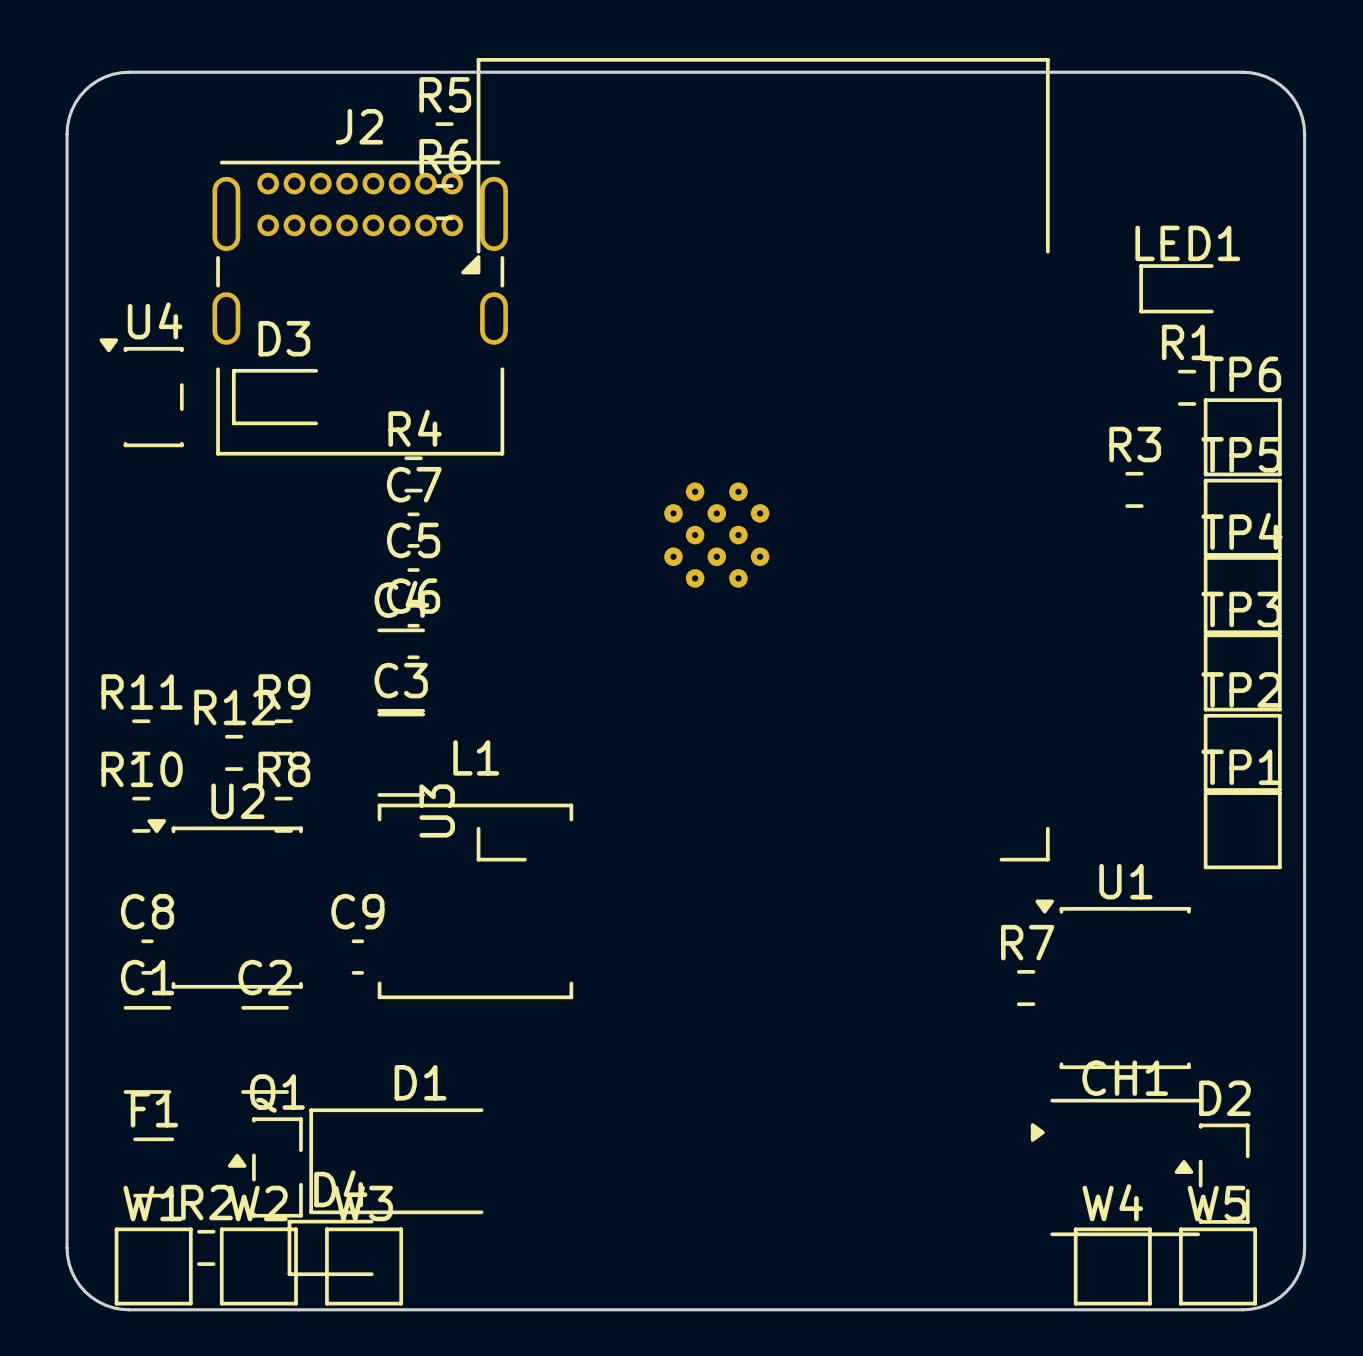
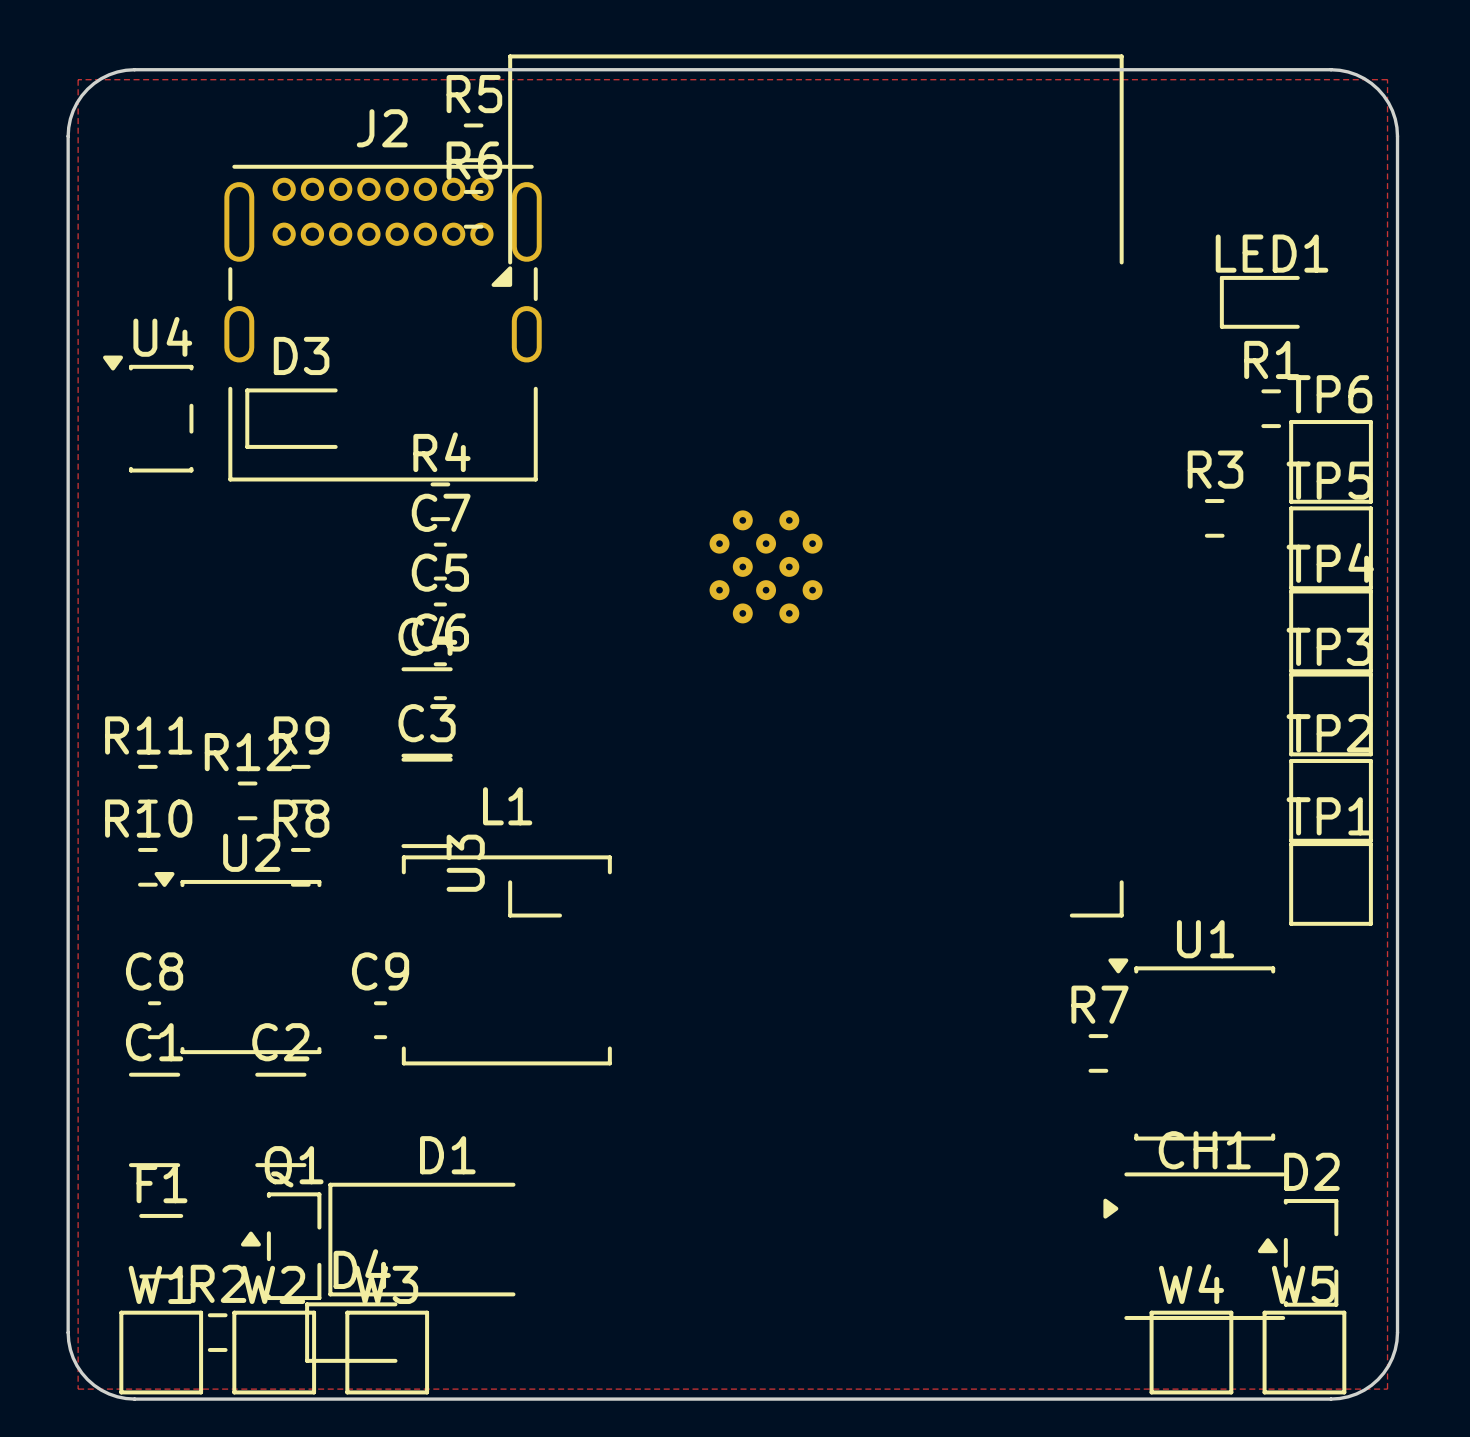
zone outline: none -> (78, 79) (1387, 79) (1387, 1389) (78, 1389) (78, 79)

